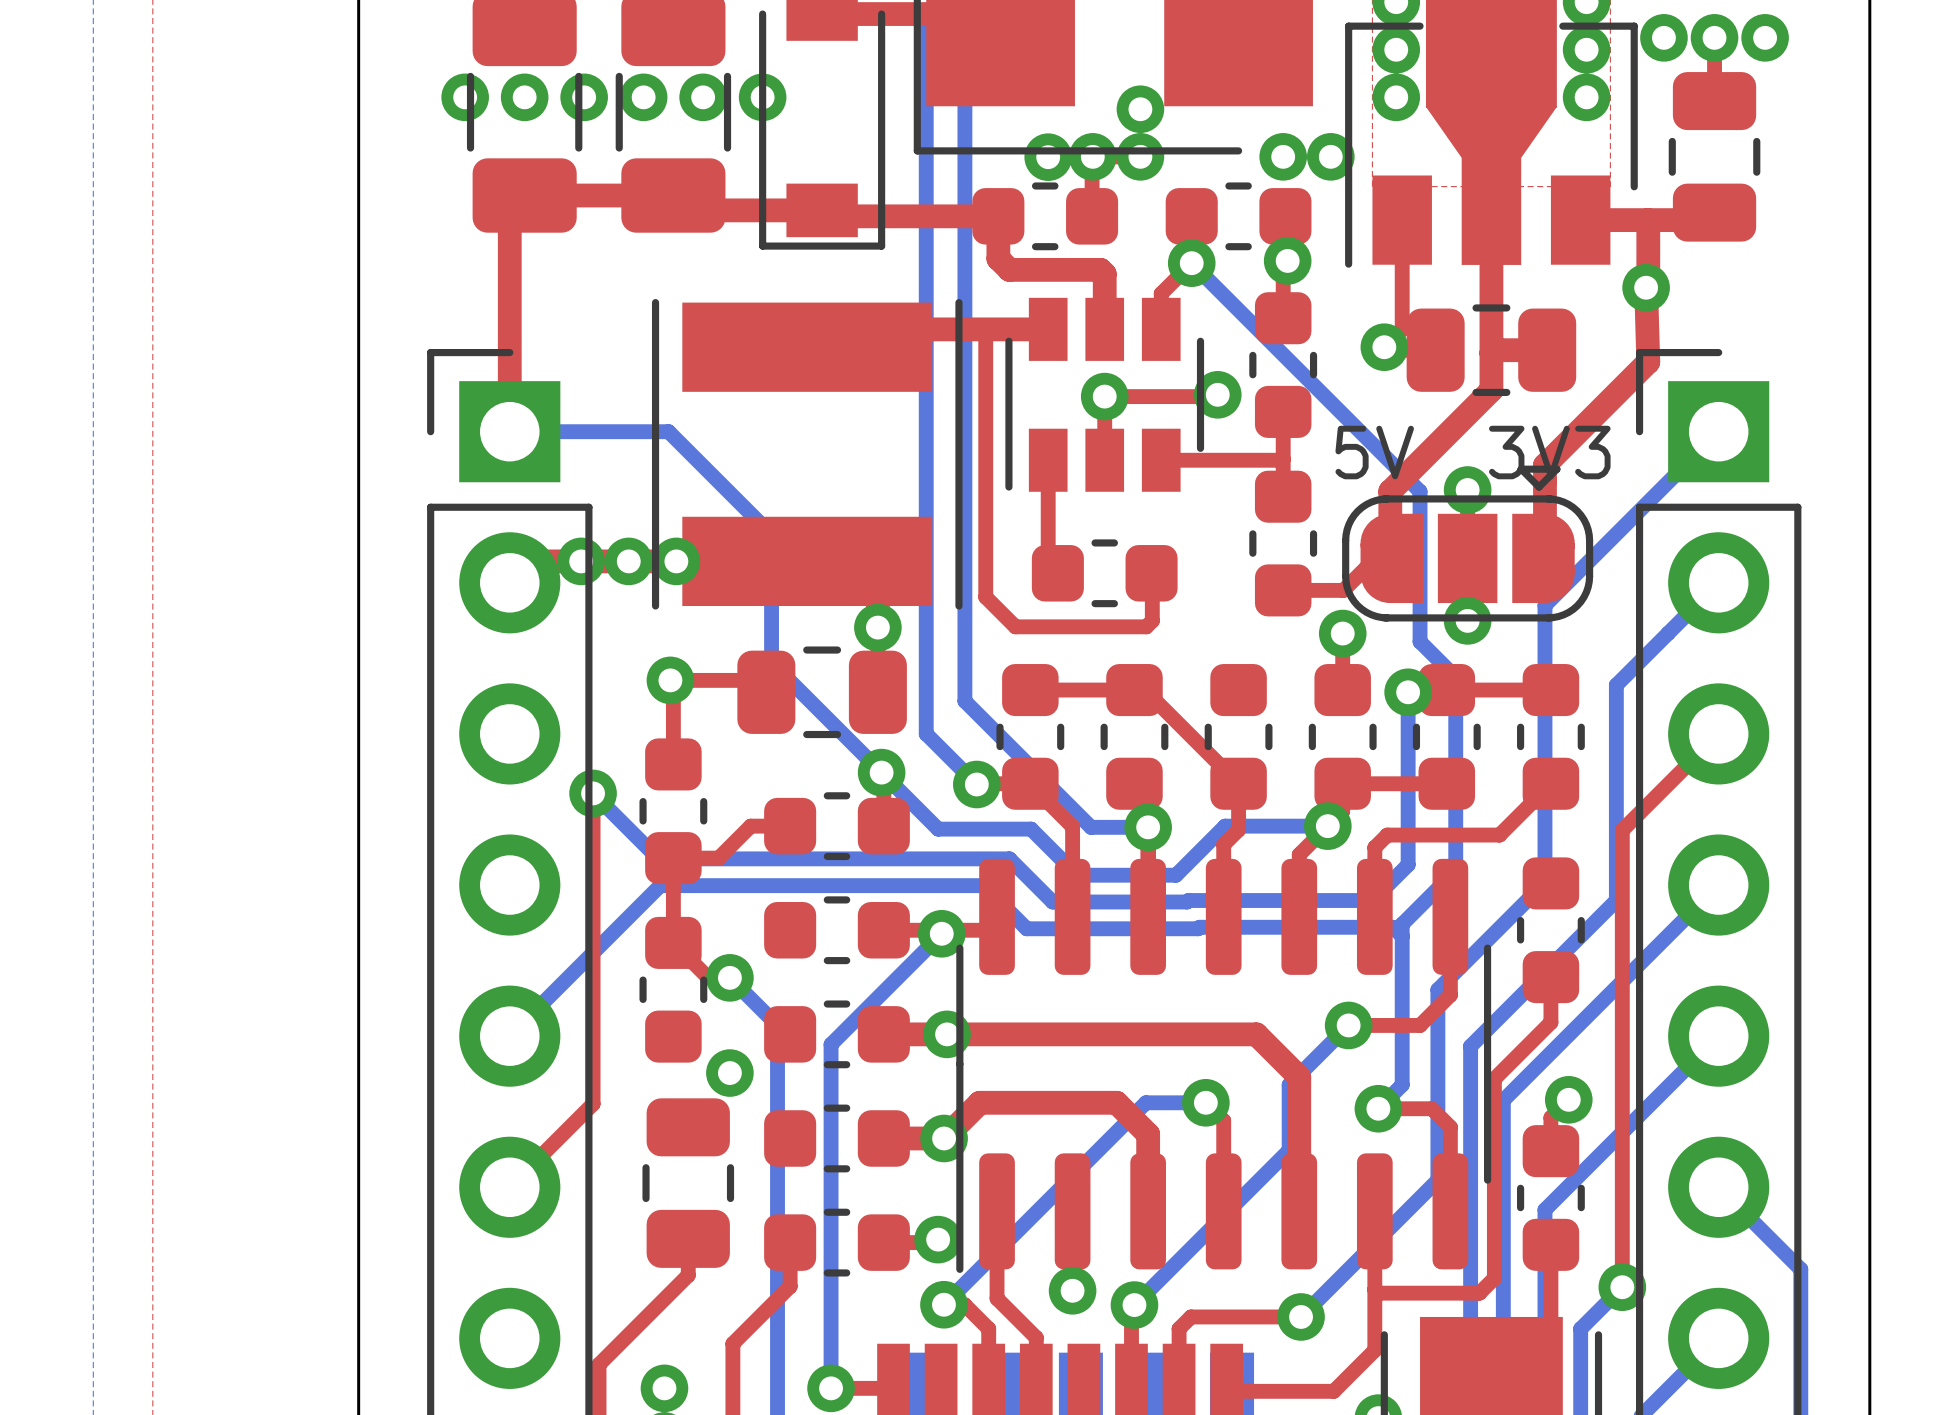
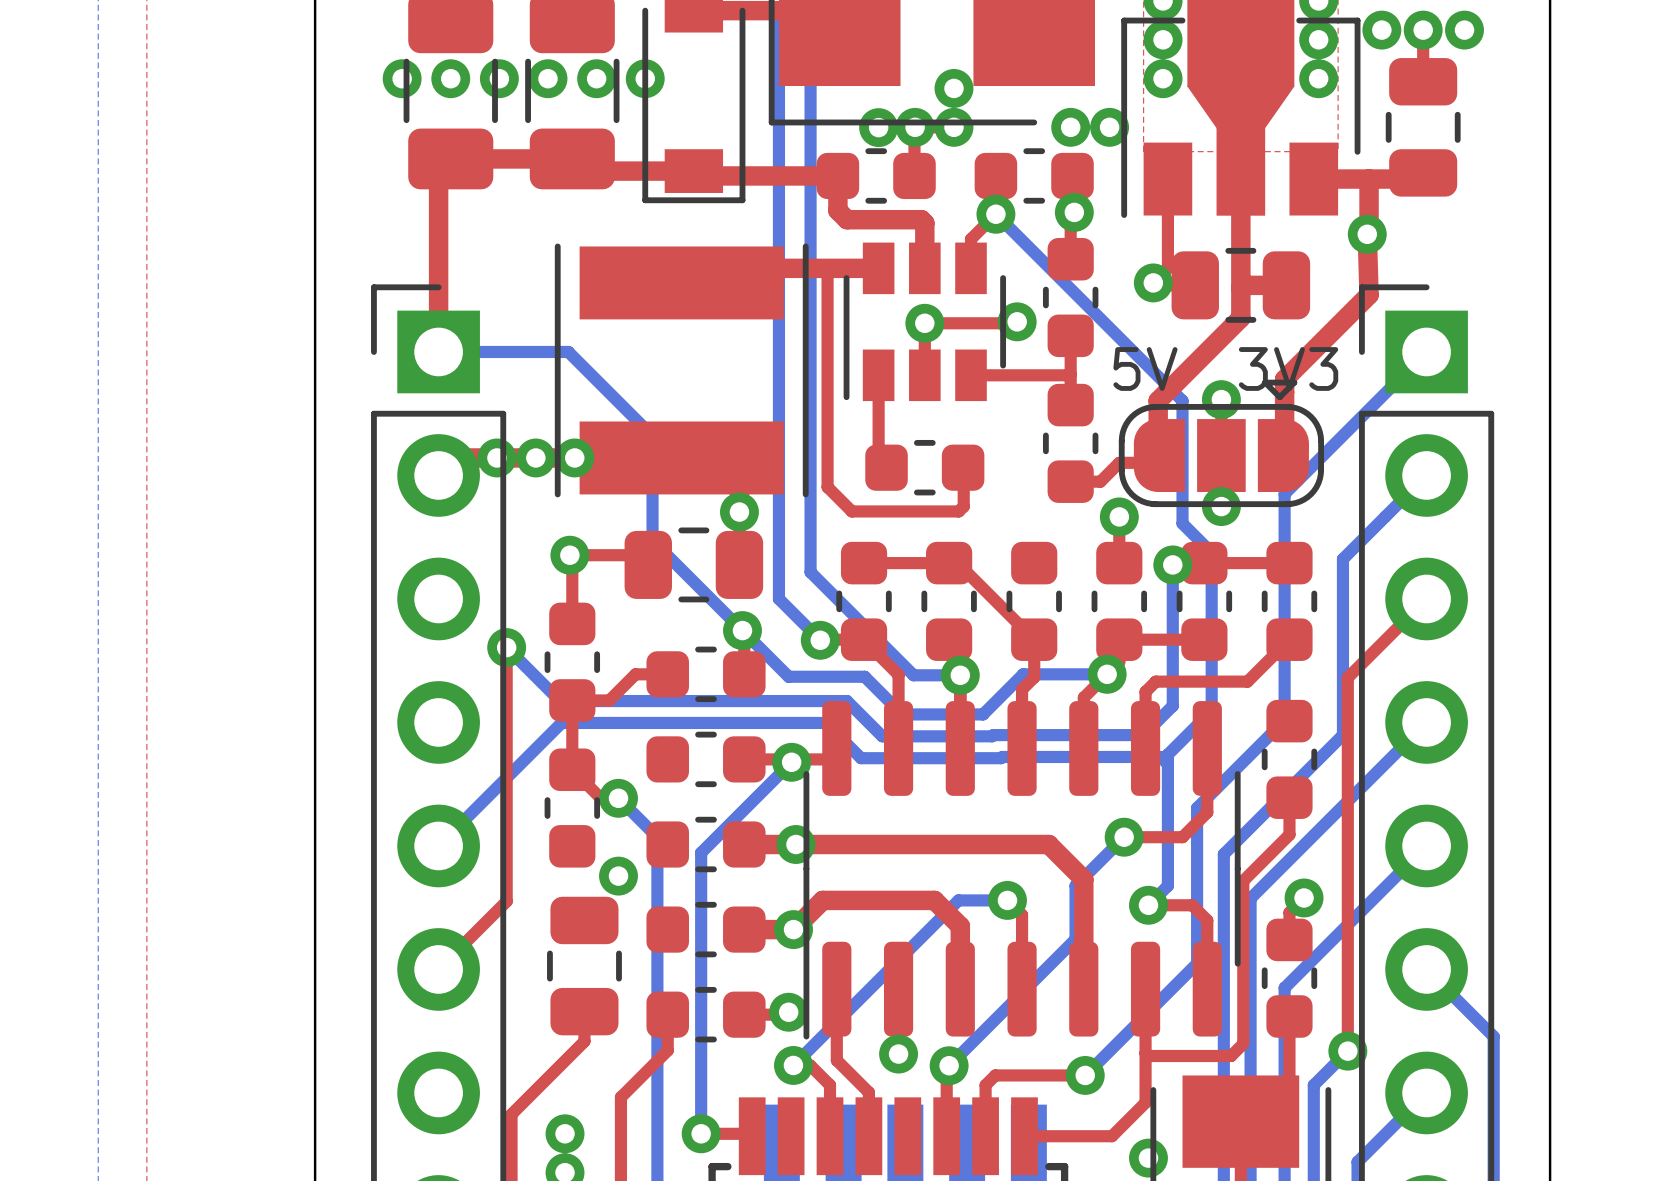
top track: (1366, 567) (1343, 590) (1319, 590) -> (1138, 462) (1119, 462) (1100, 481)

